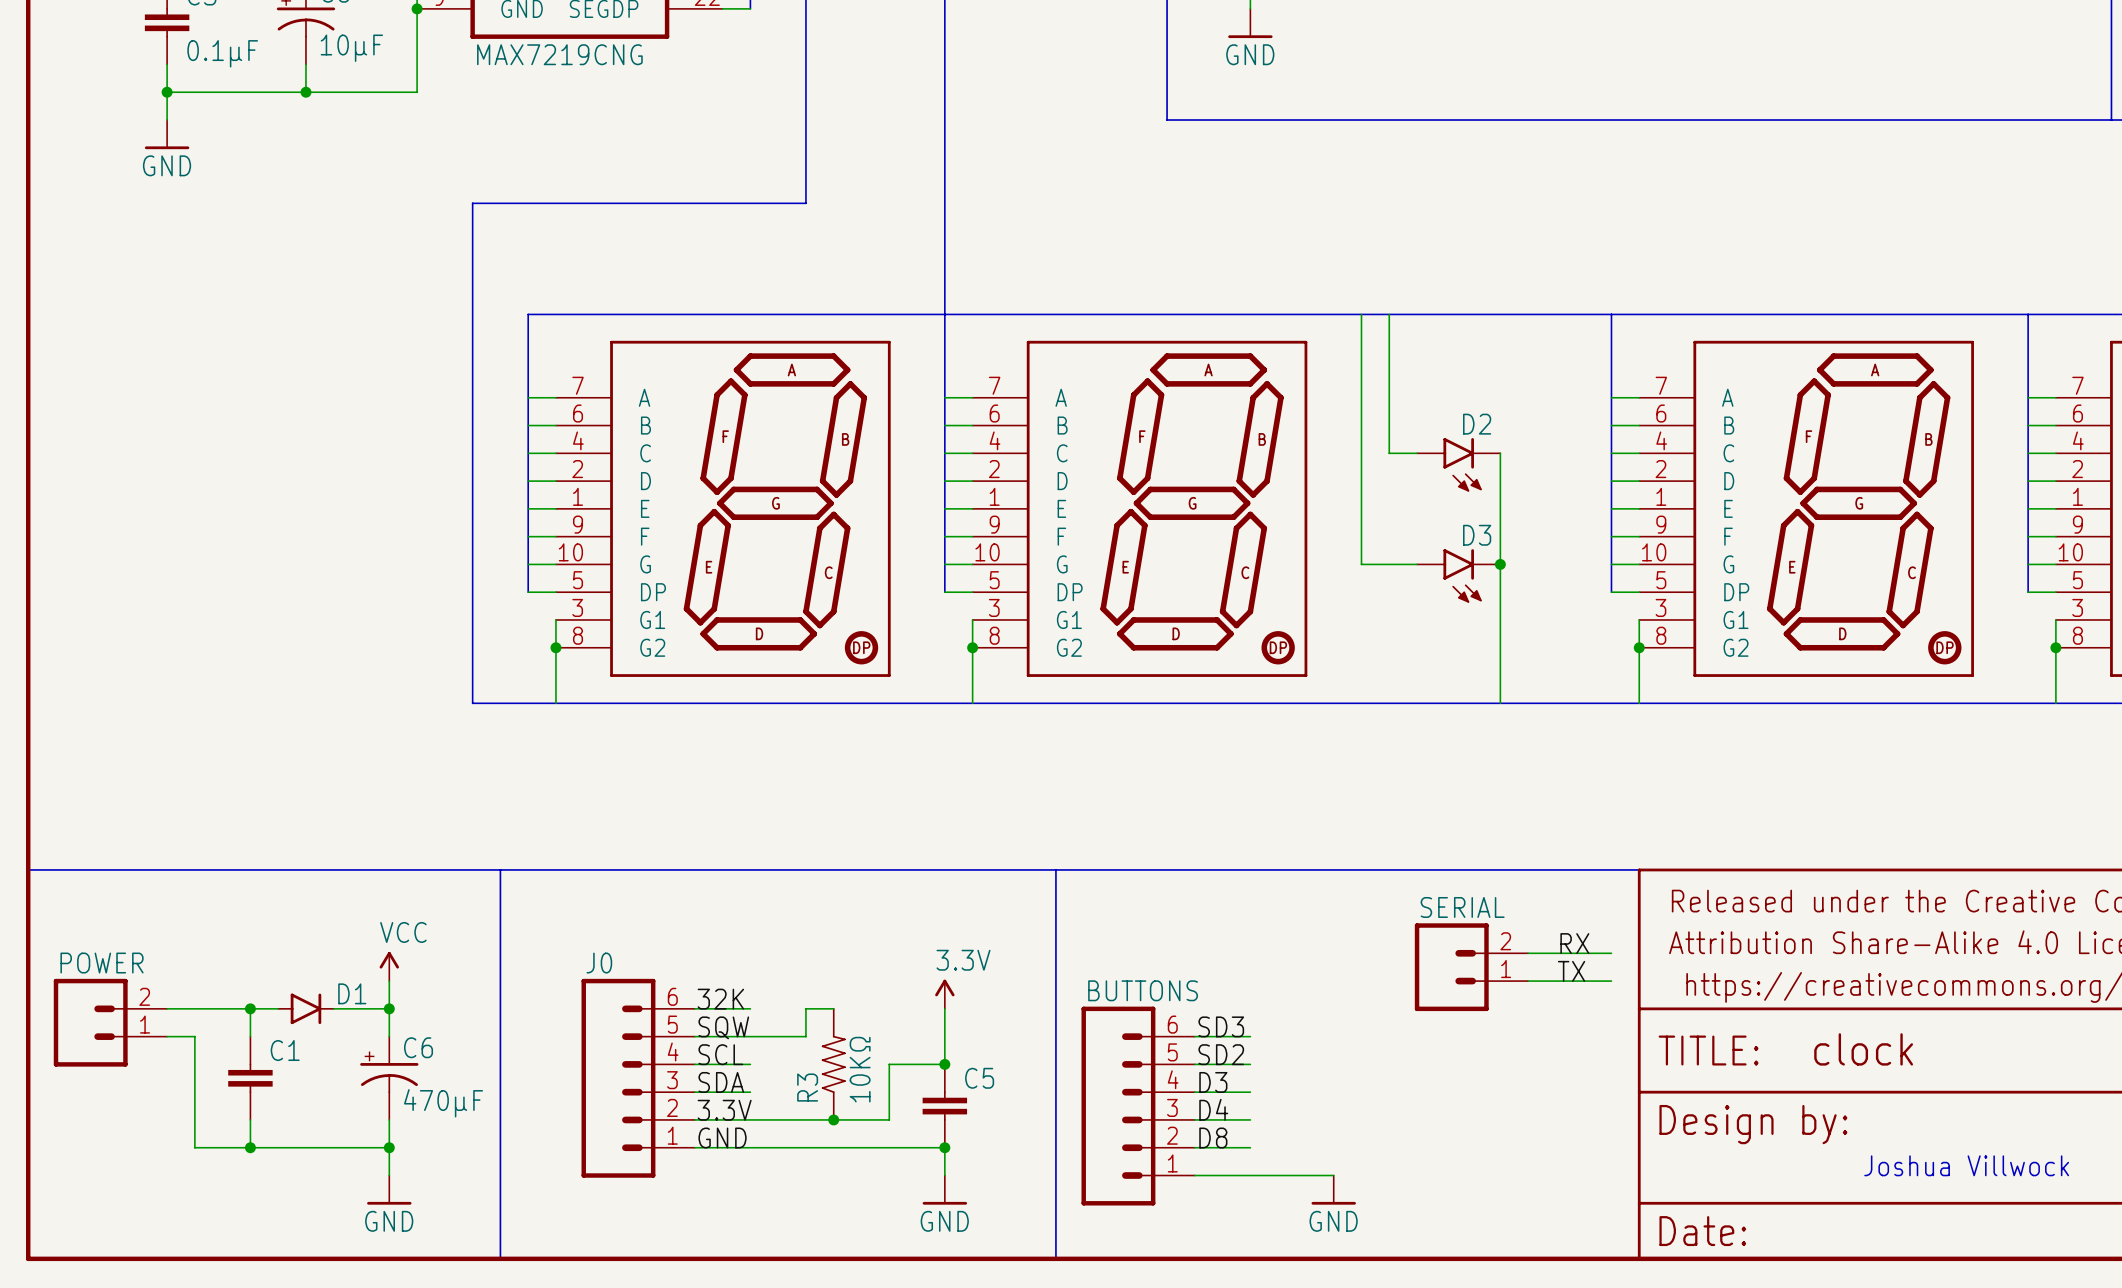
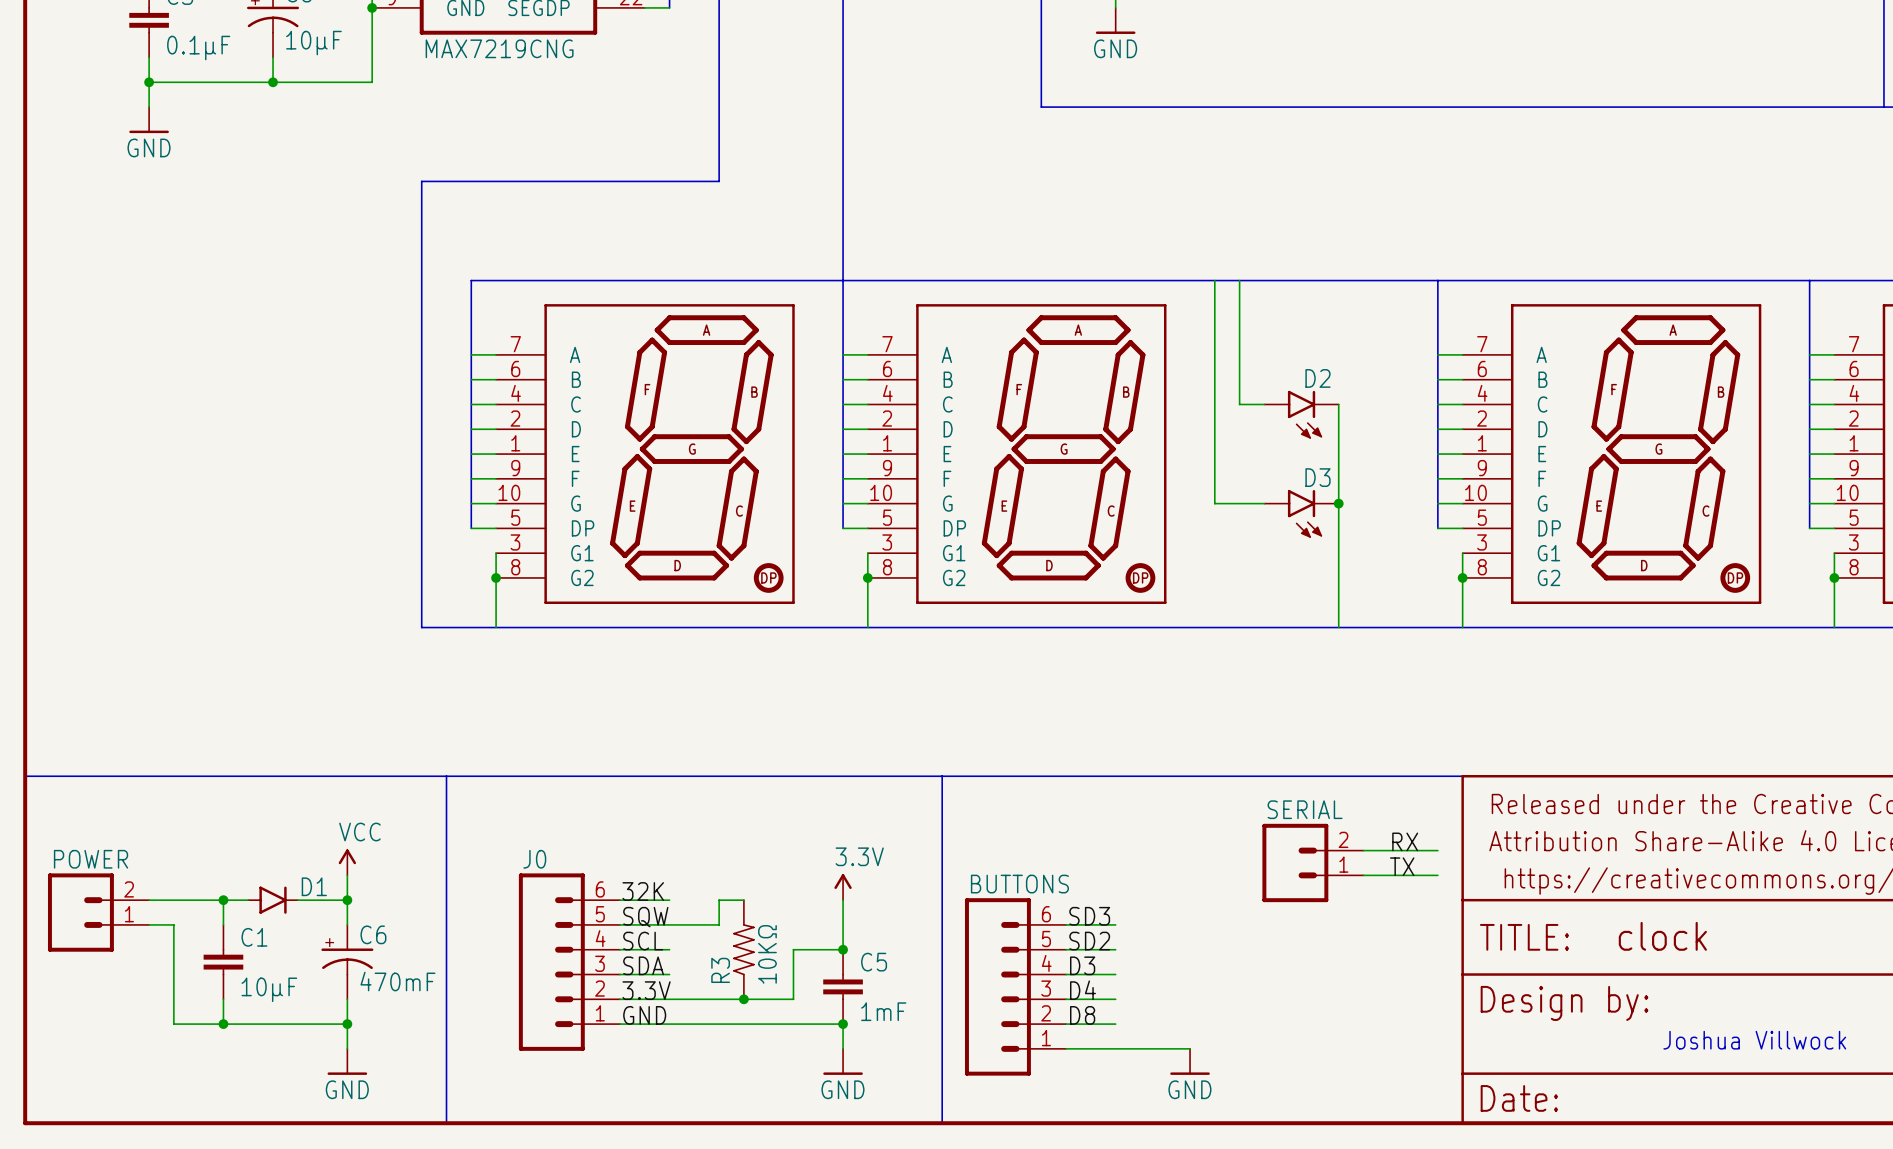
C6 value: 470μF (443, 1103) -> 470mF (397, 981)
C1 value: none -> 10μF (269, 989)
C5 value: none -> 1mF (883, 1011)

